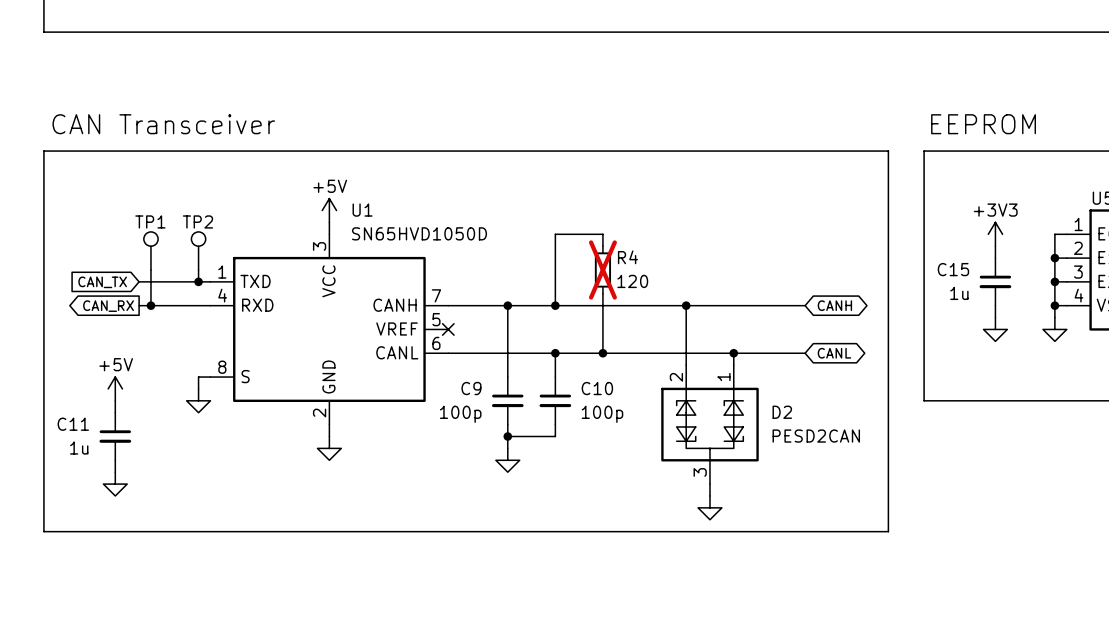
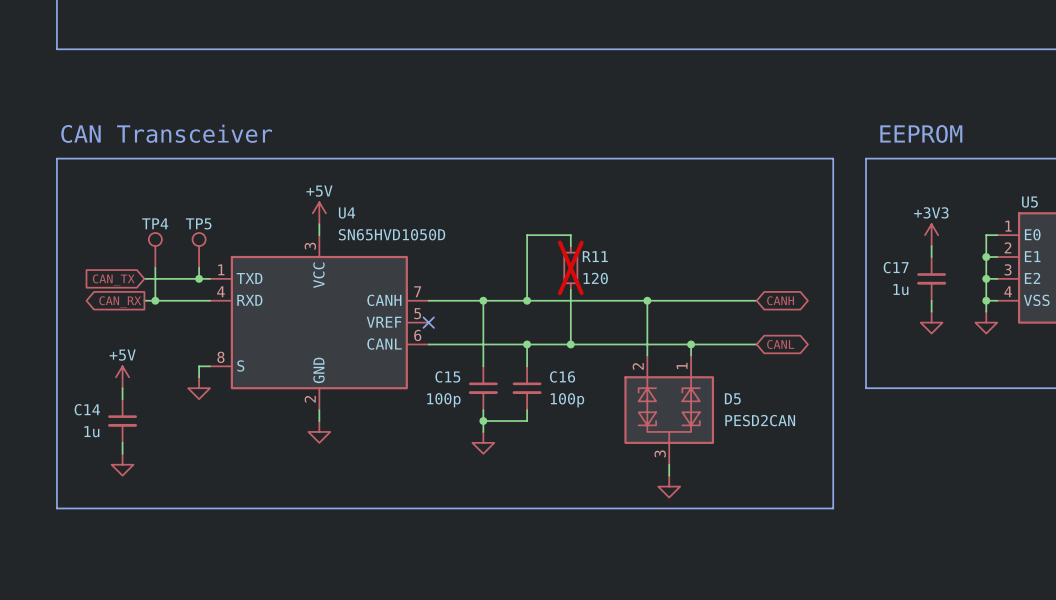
U1 name: U1 (362, 210) -> U4 (347, 212)
TP1 name: TP1 (150, 221) -> TP4 (155, 223)
TP2 name: TP2 (197, 221) -> TP5 (198, 223)
R4 name: R4 (627, 257) -> R11 (595, 256)
C15 name: C15 (953, 269) -> C17 (896, 267)
C9 name: C9 (471, 388) -> C15 (447, 376)
C10 name: C10 (597, 388) -> C16 (562, 376)
D2 name: D2 (782, 412) -> D5 (732, 398)
C11 name: C11 (73, 424) -> C14 (87, 409)

